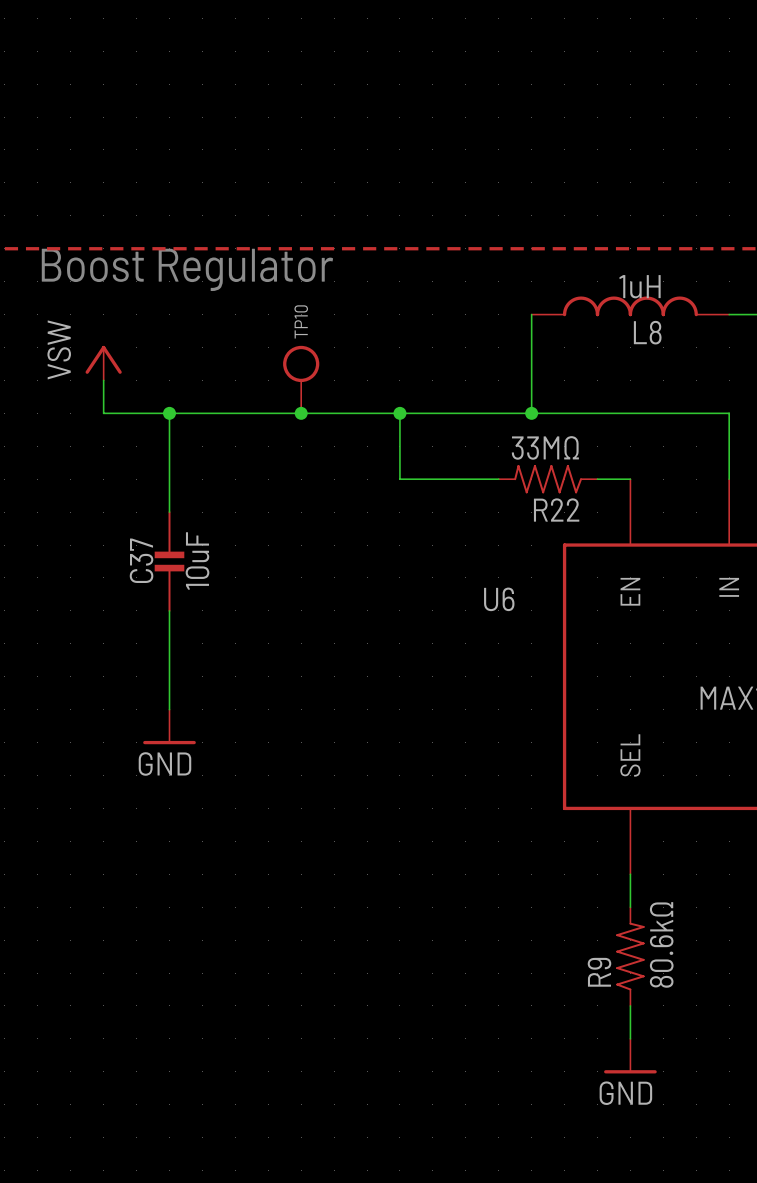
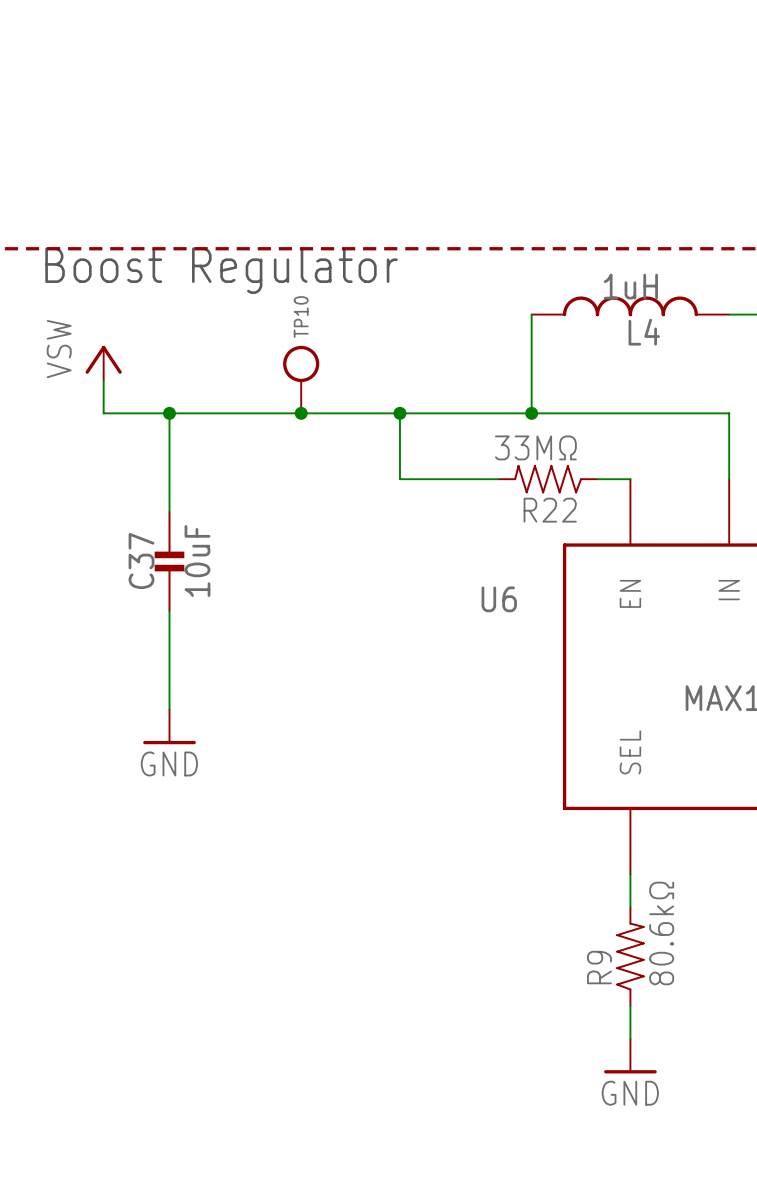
L8 name: L8 (647, 332) -> L4 (644, 332)

